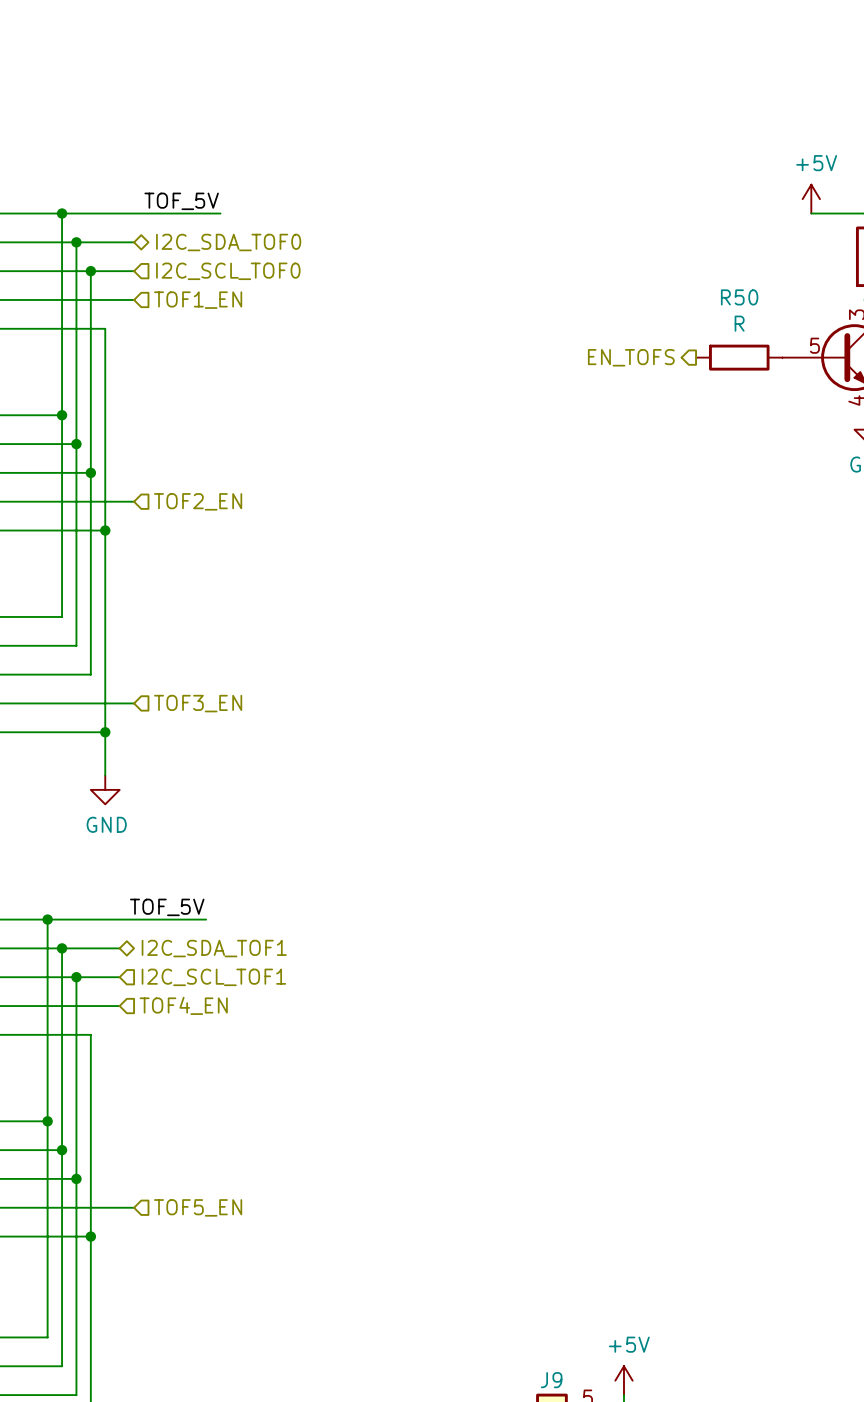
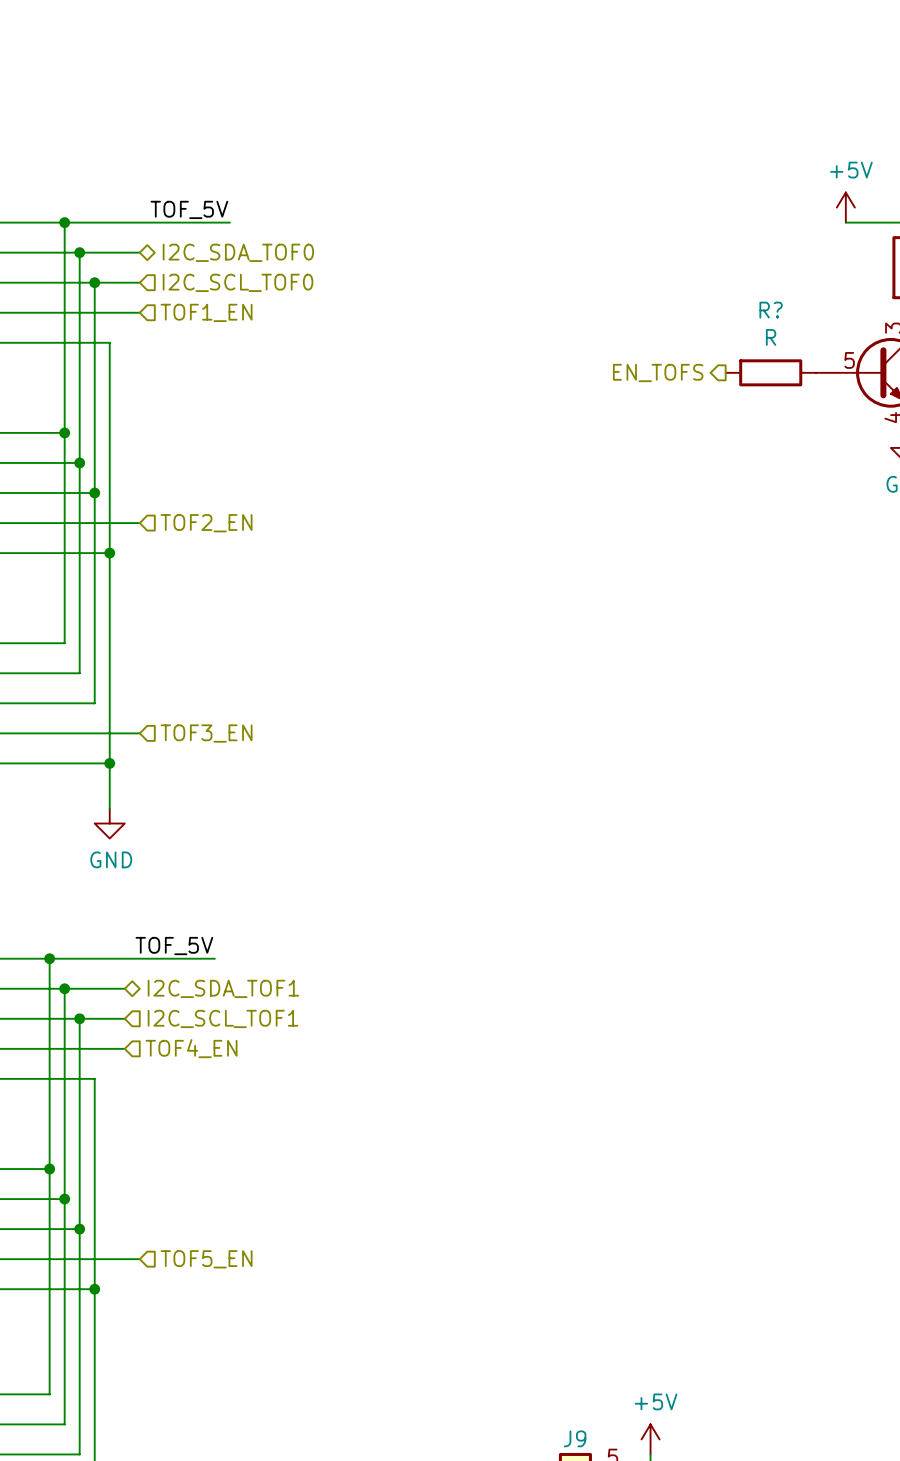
R50 name: R50 (739, 297) -> R? (771, 310)

